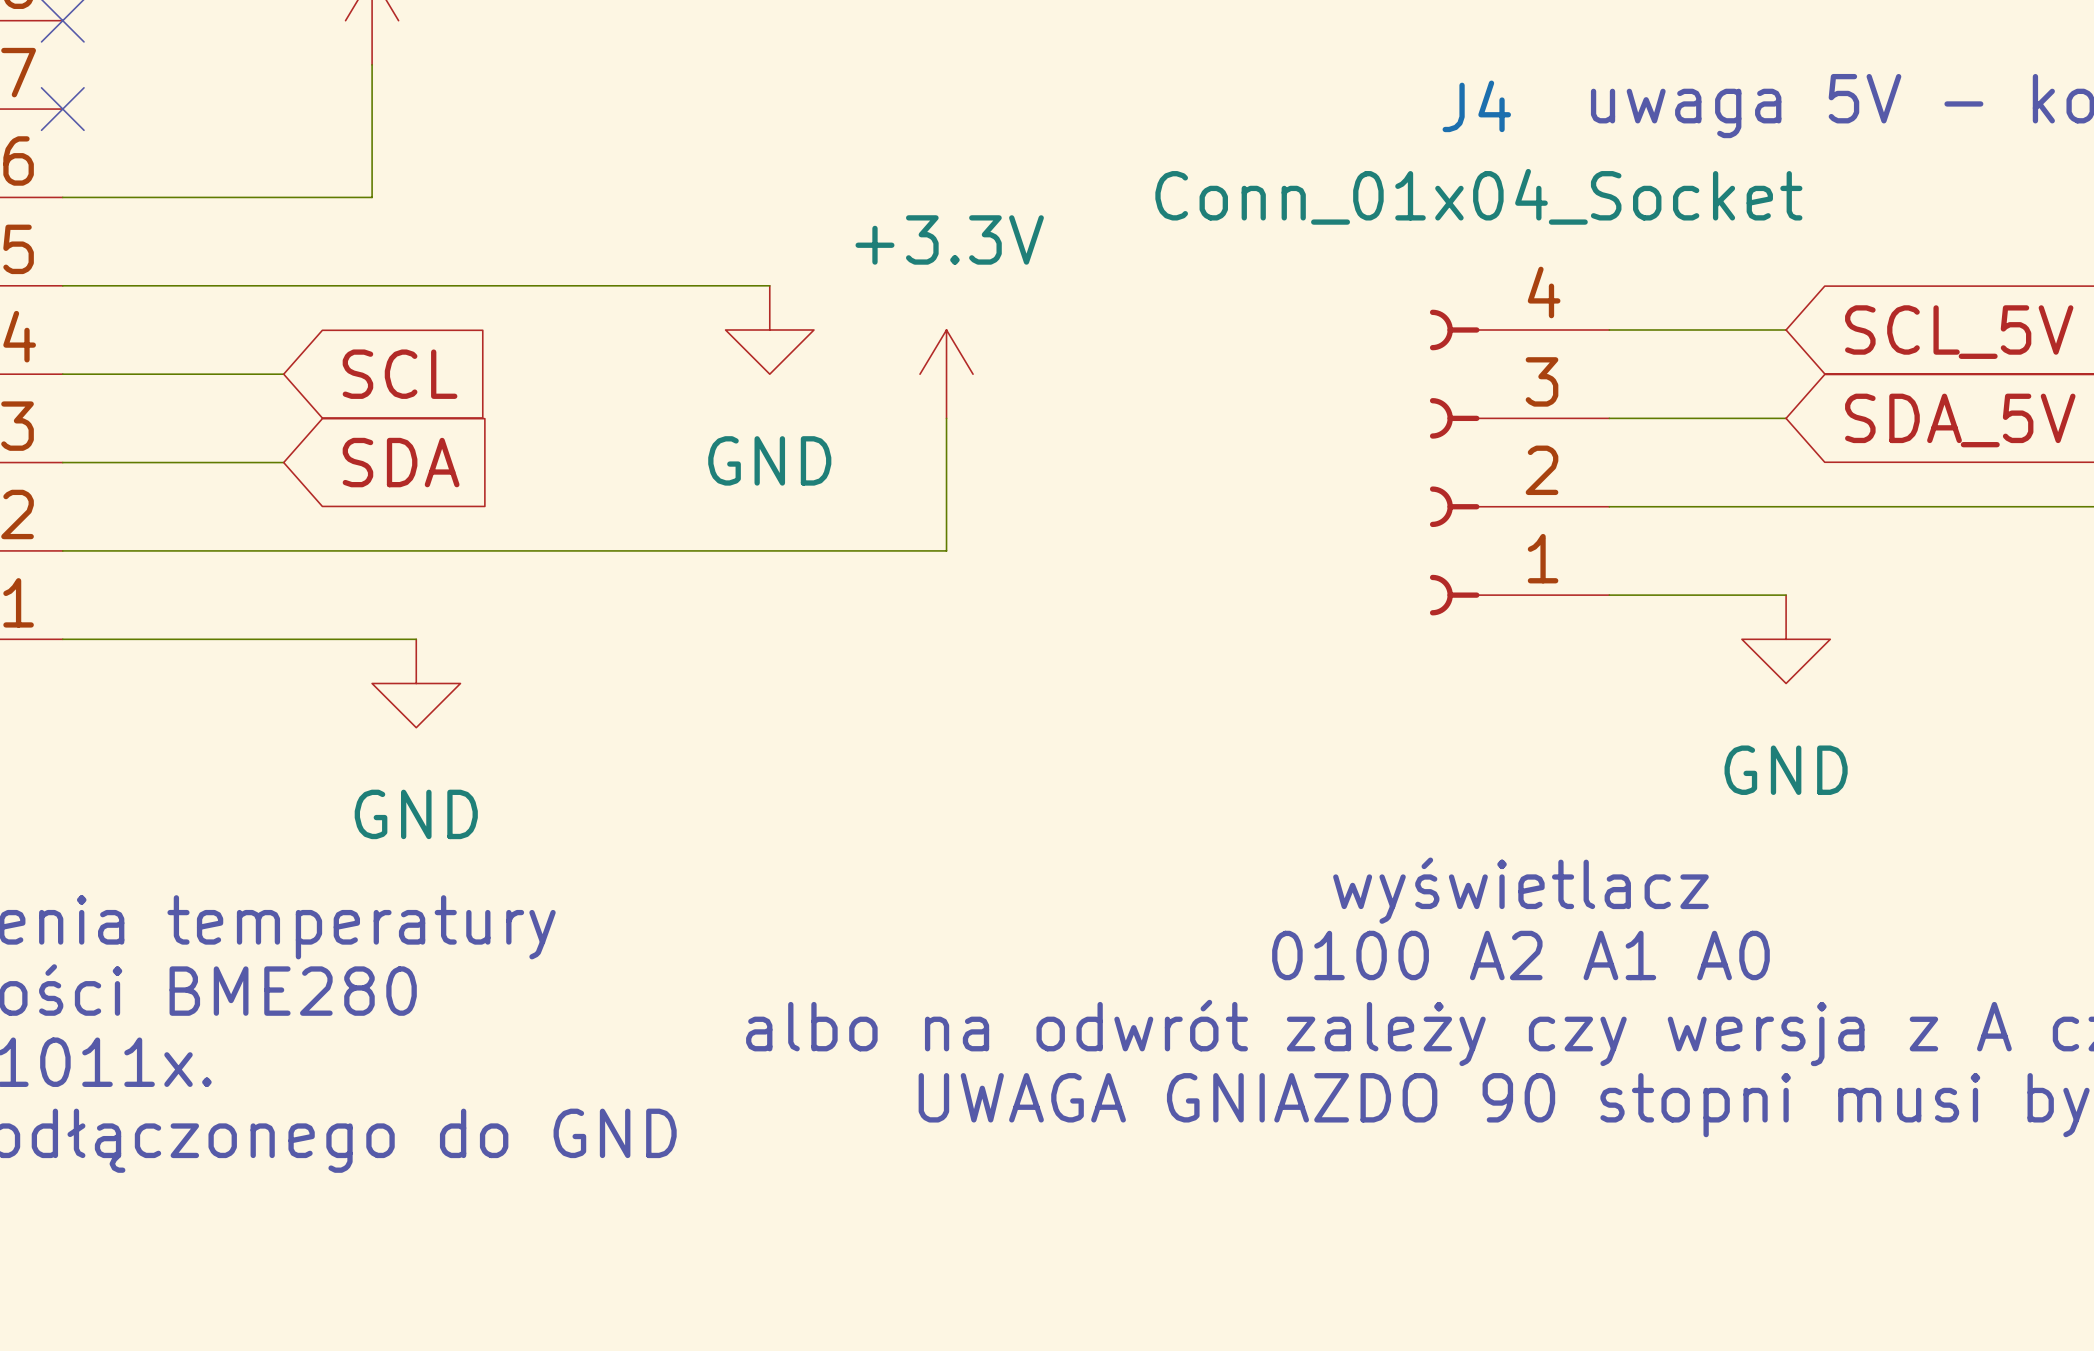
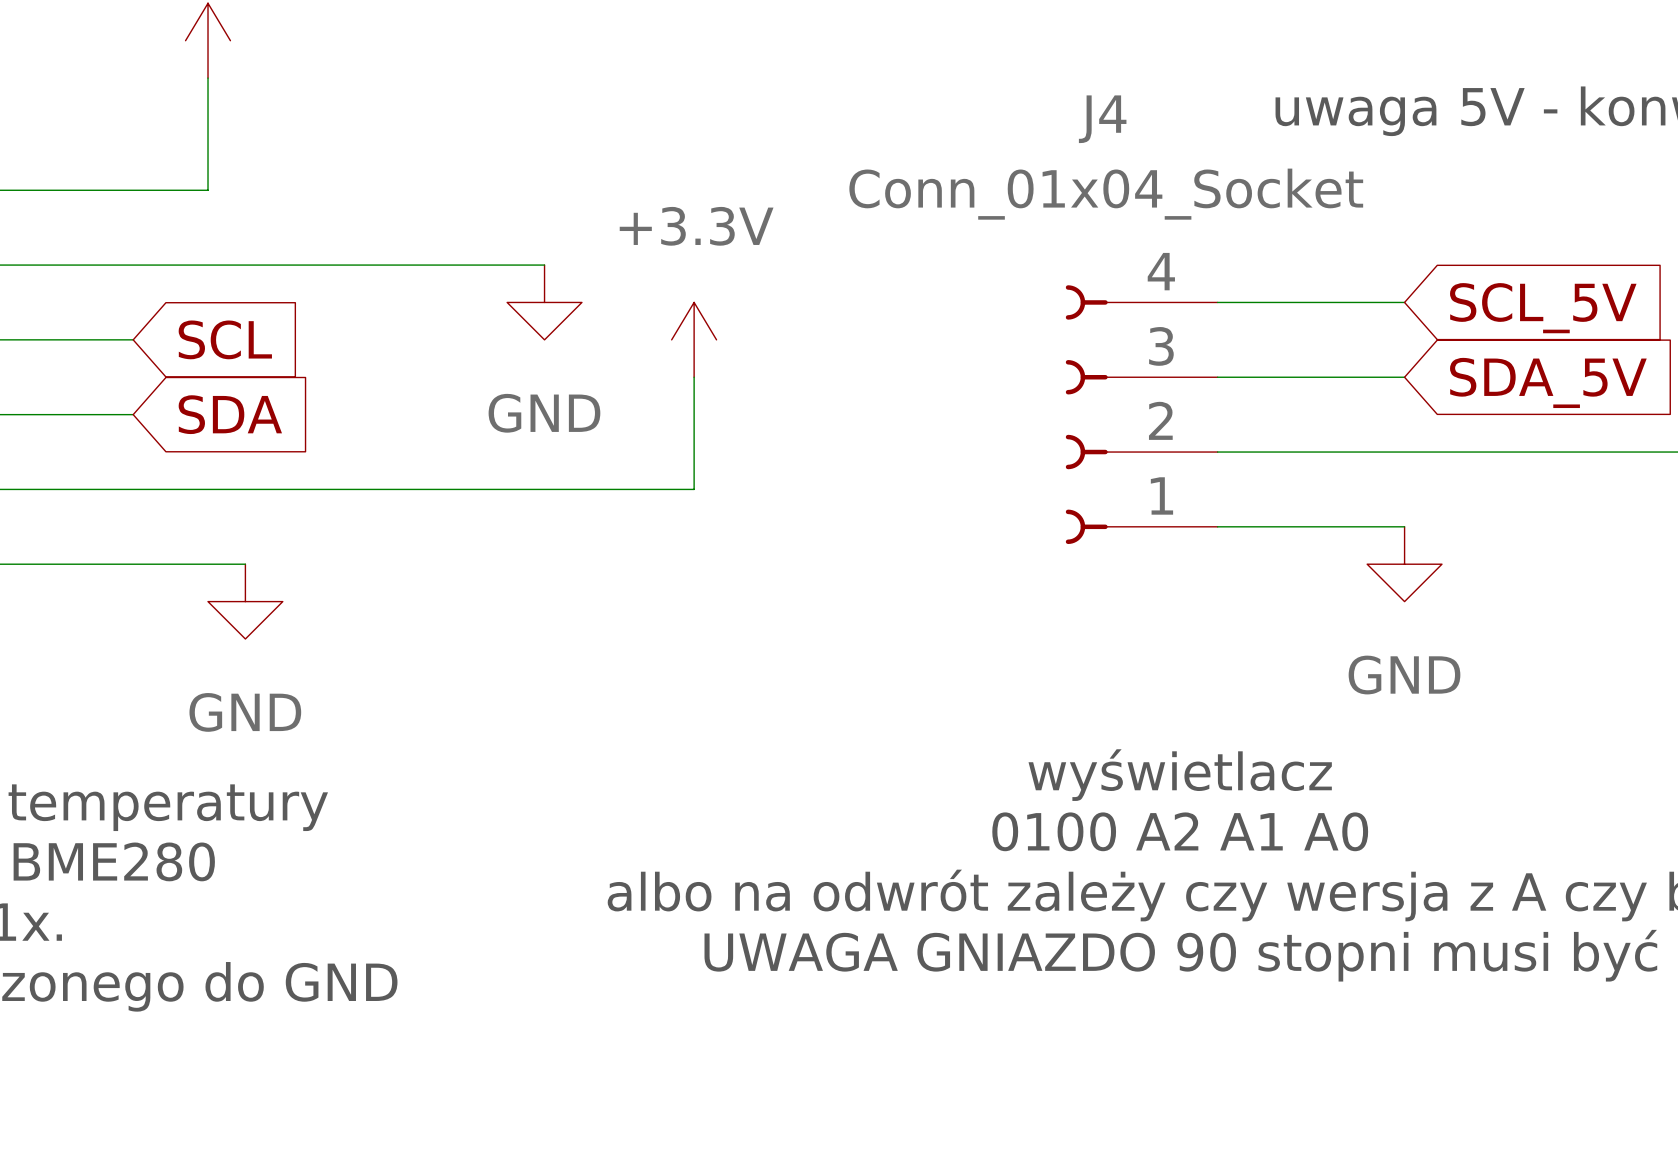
J4 position: (1519, 462) -> (1141, 414)

